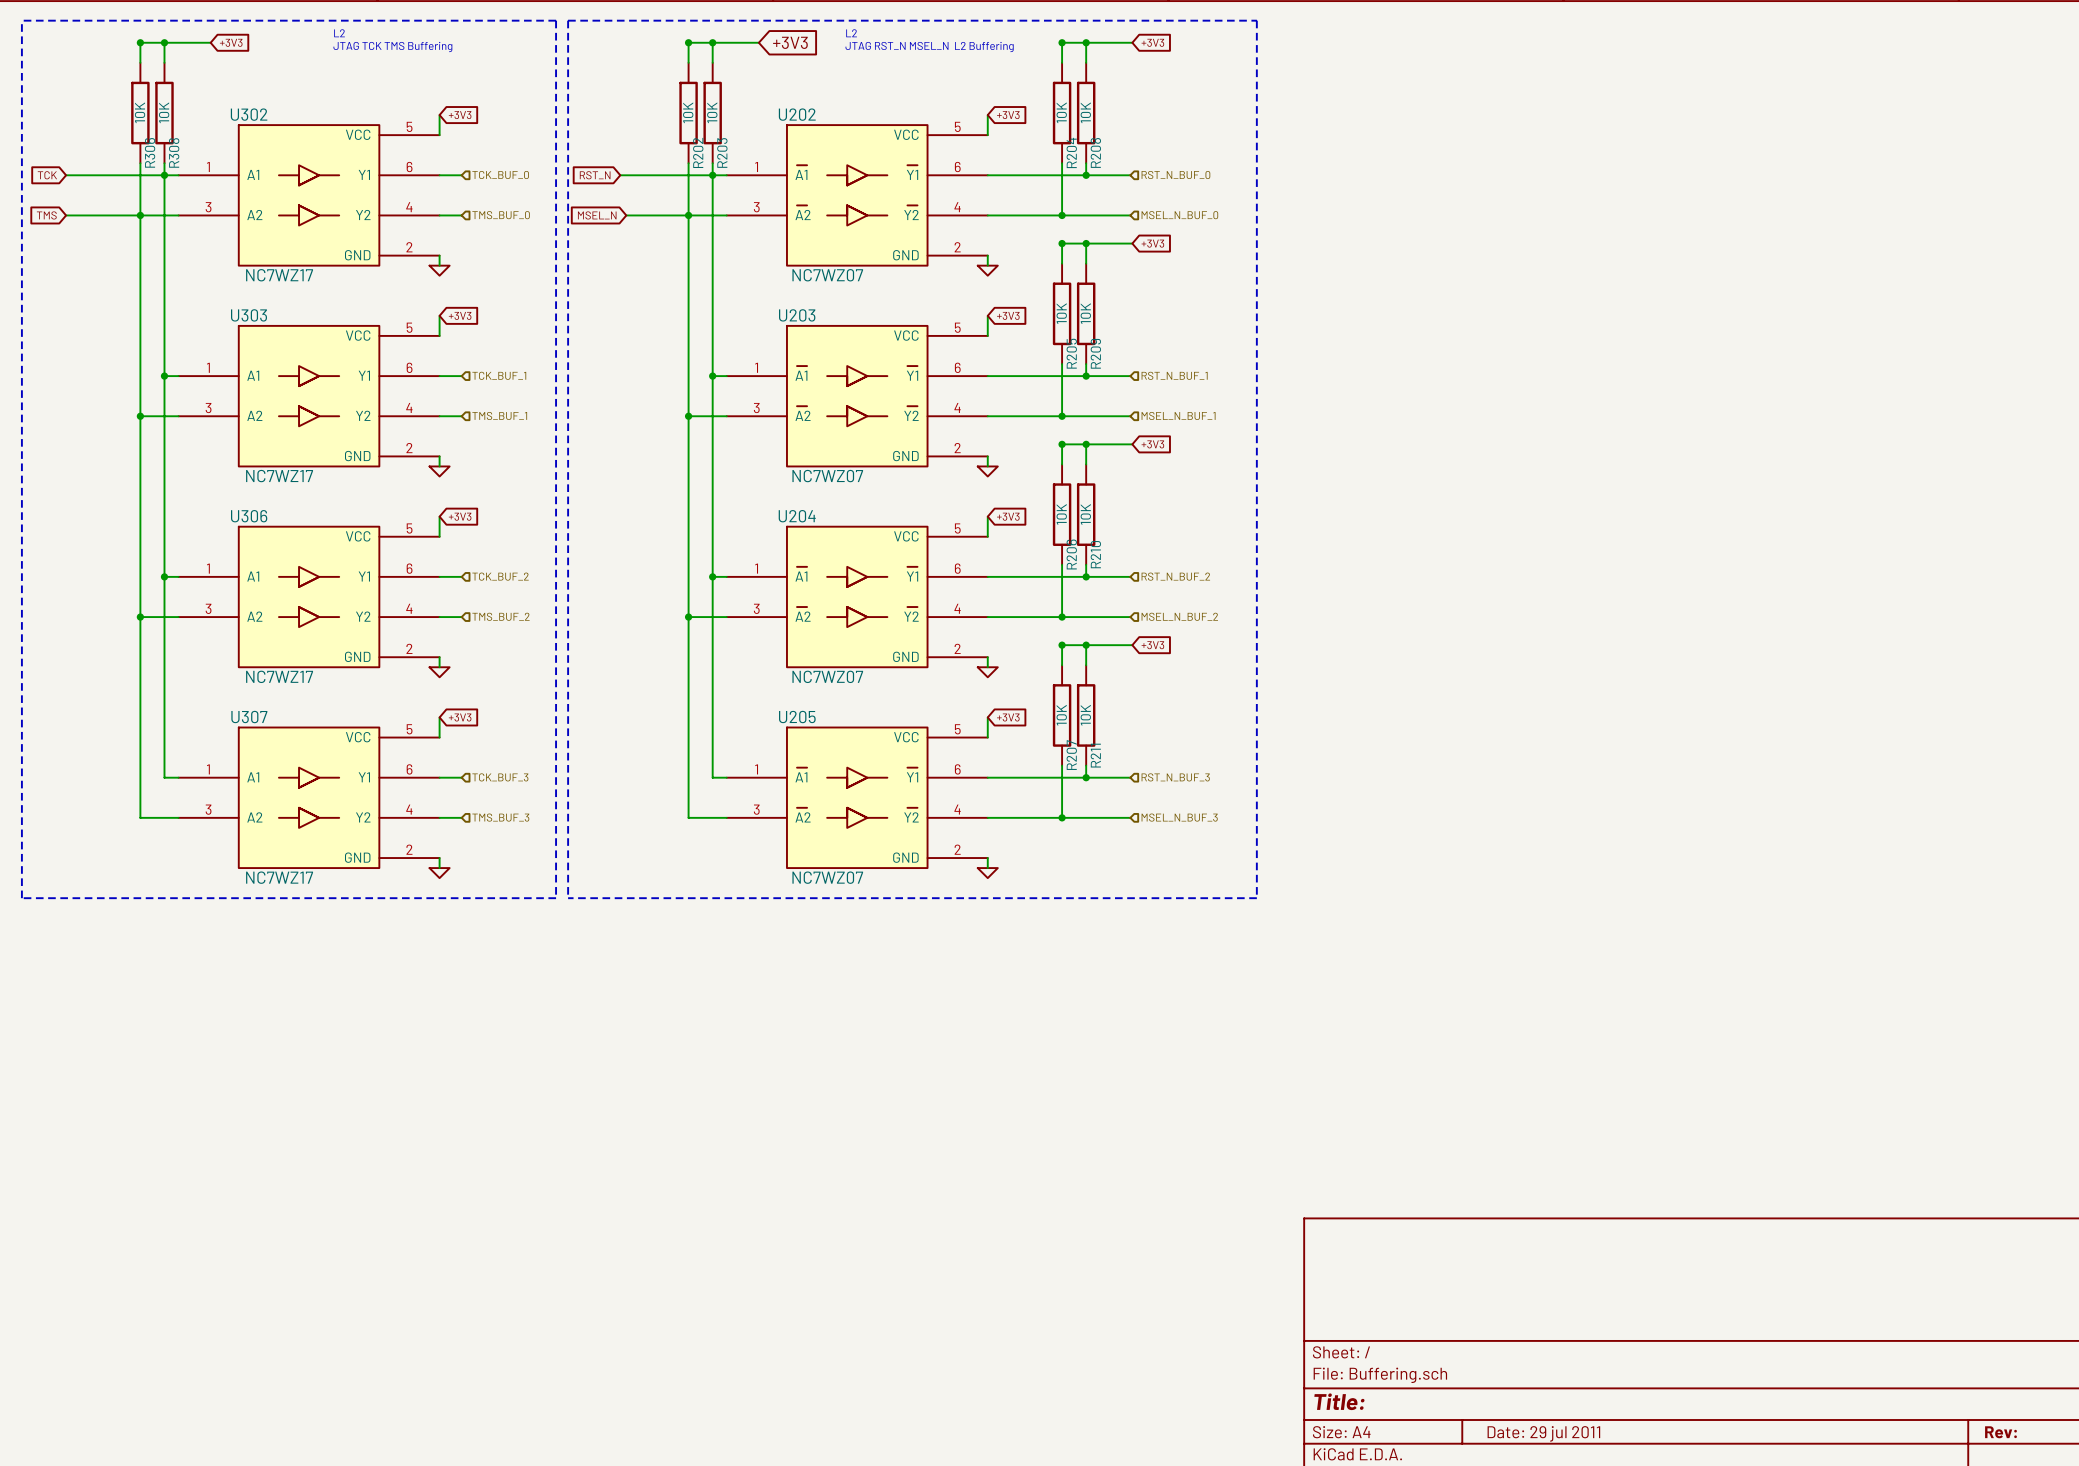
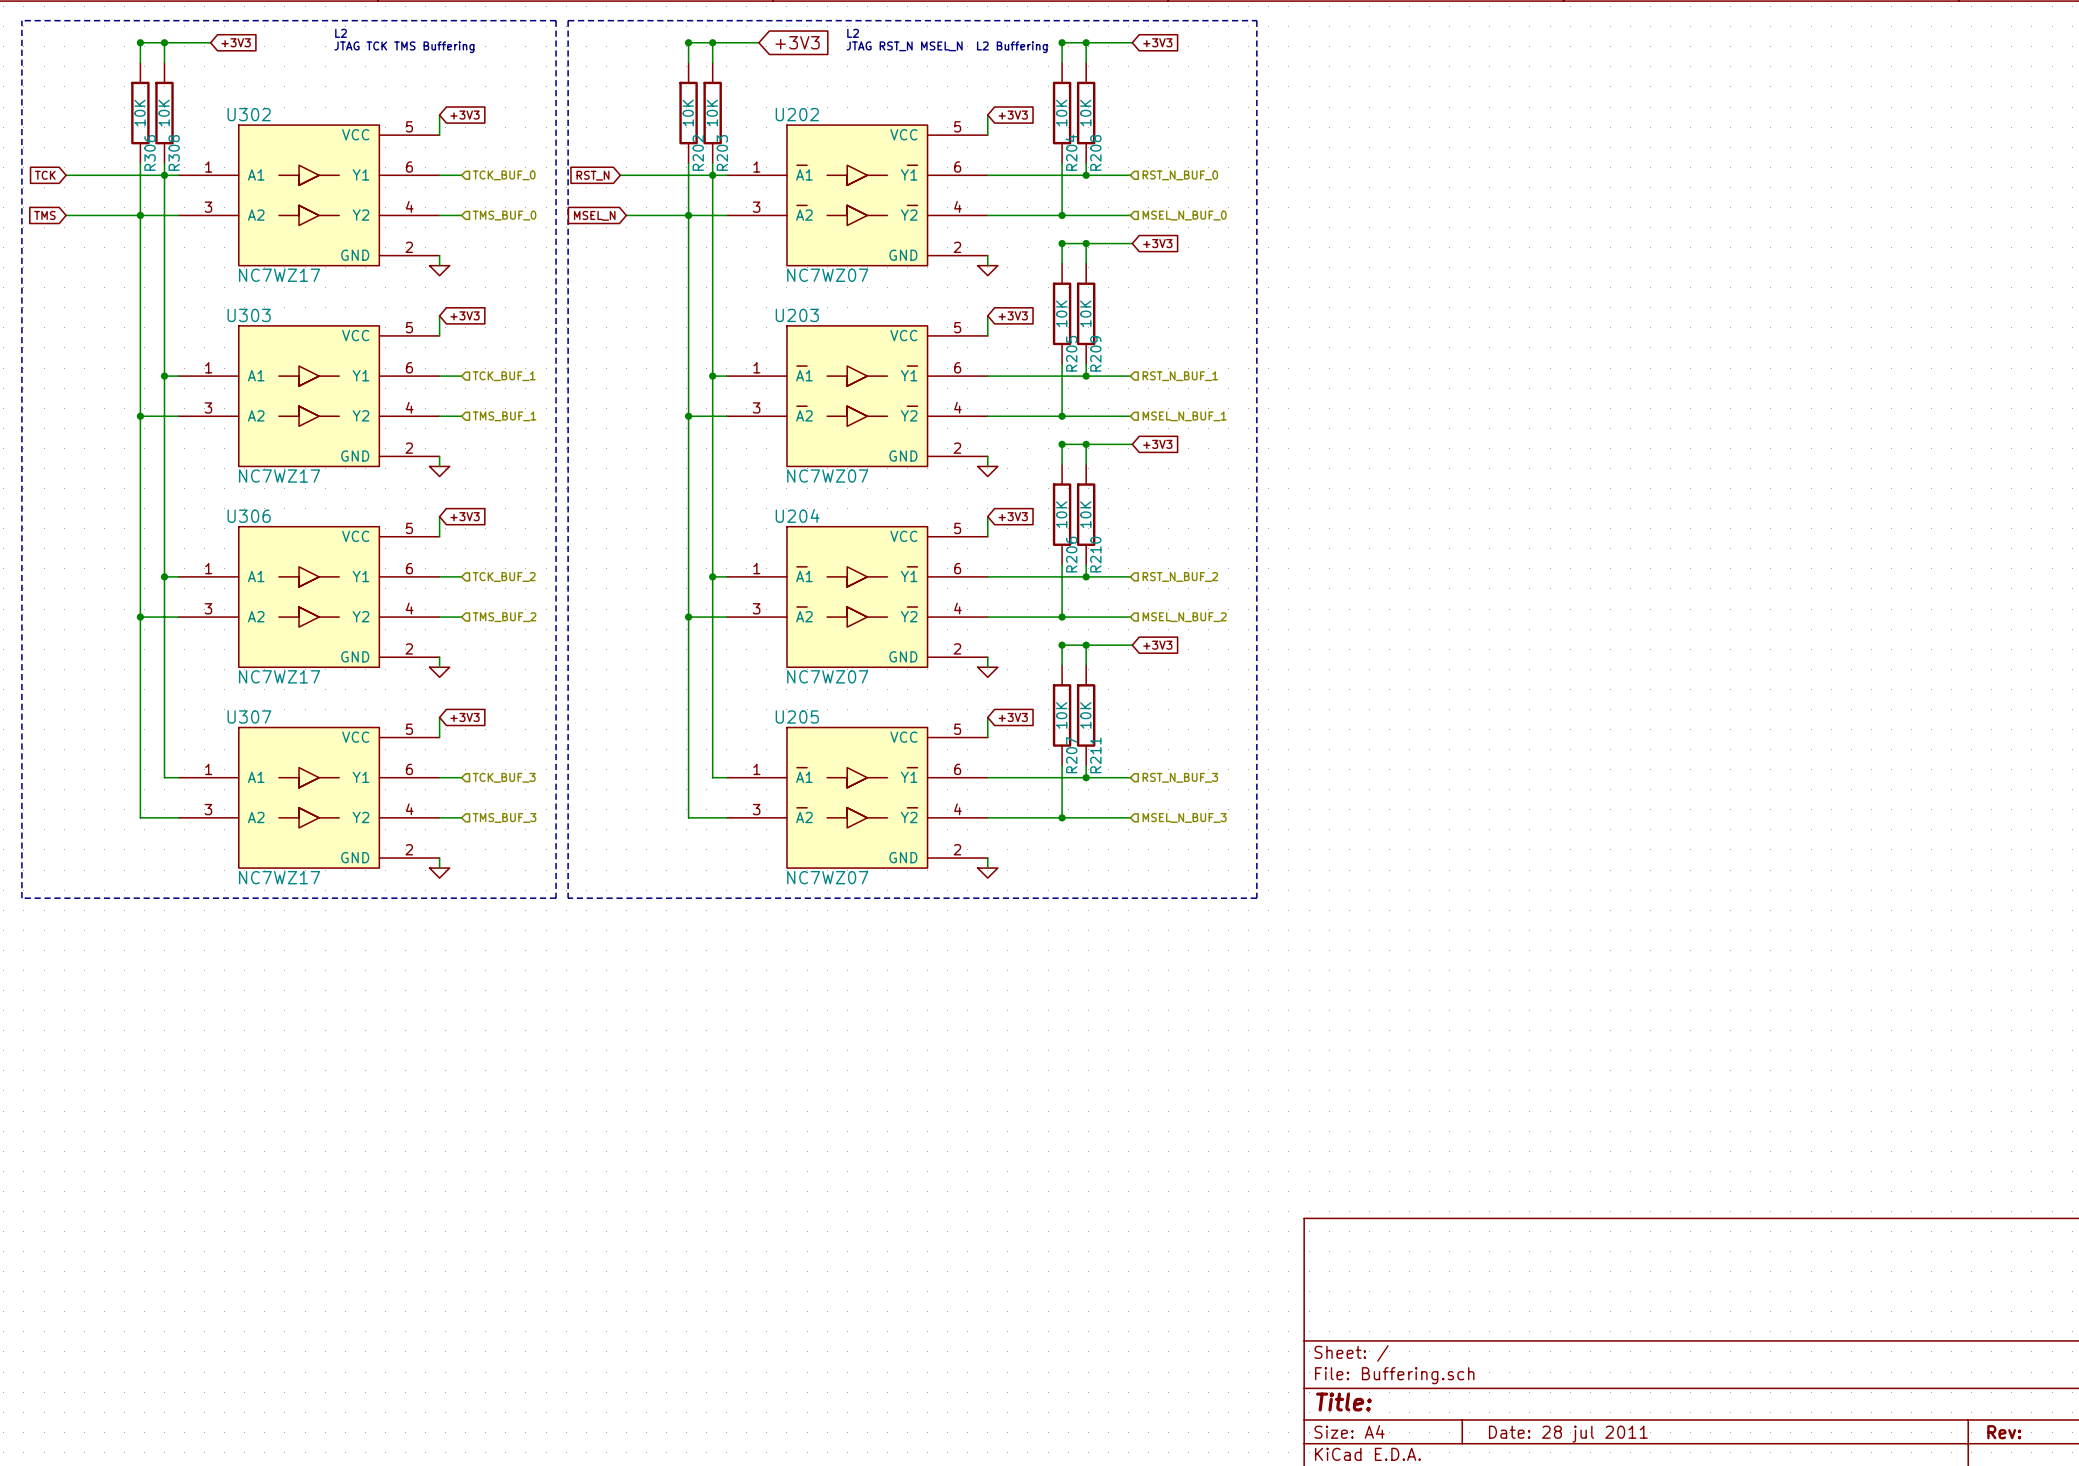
title block: Date: 29 jul 2011 (1543, 1433) -> Date: 28 jul 2011 (1568, 1434)

